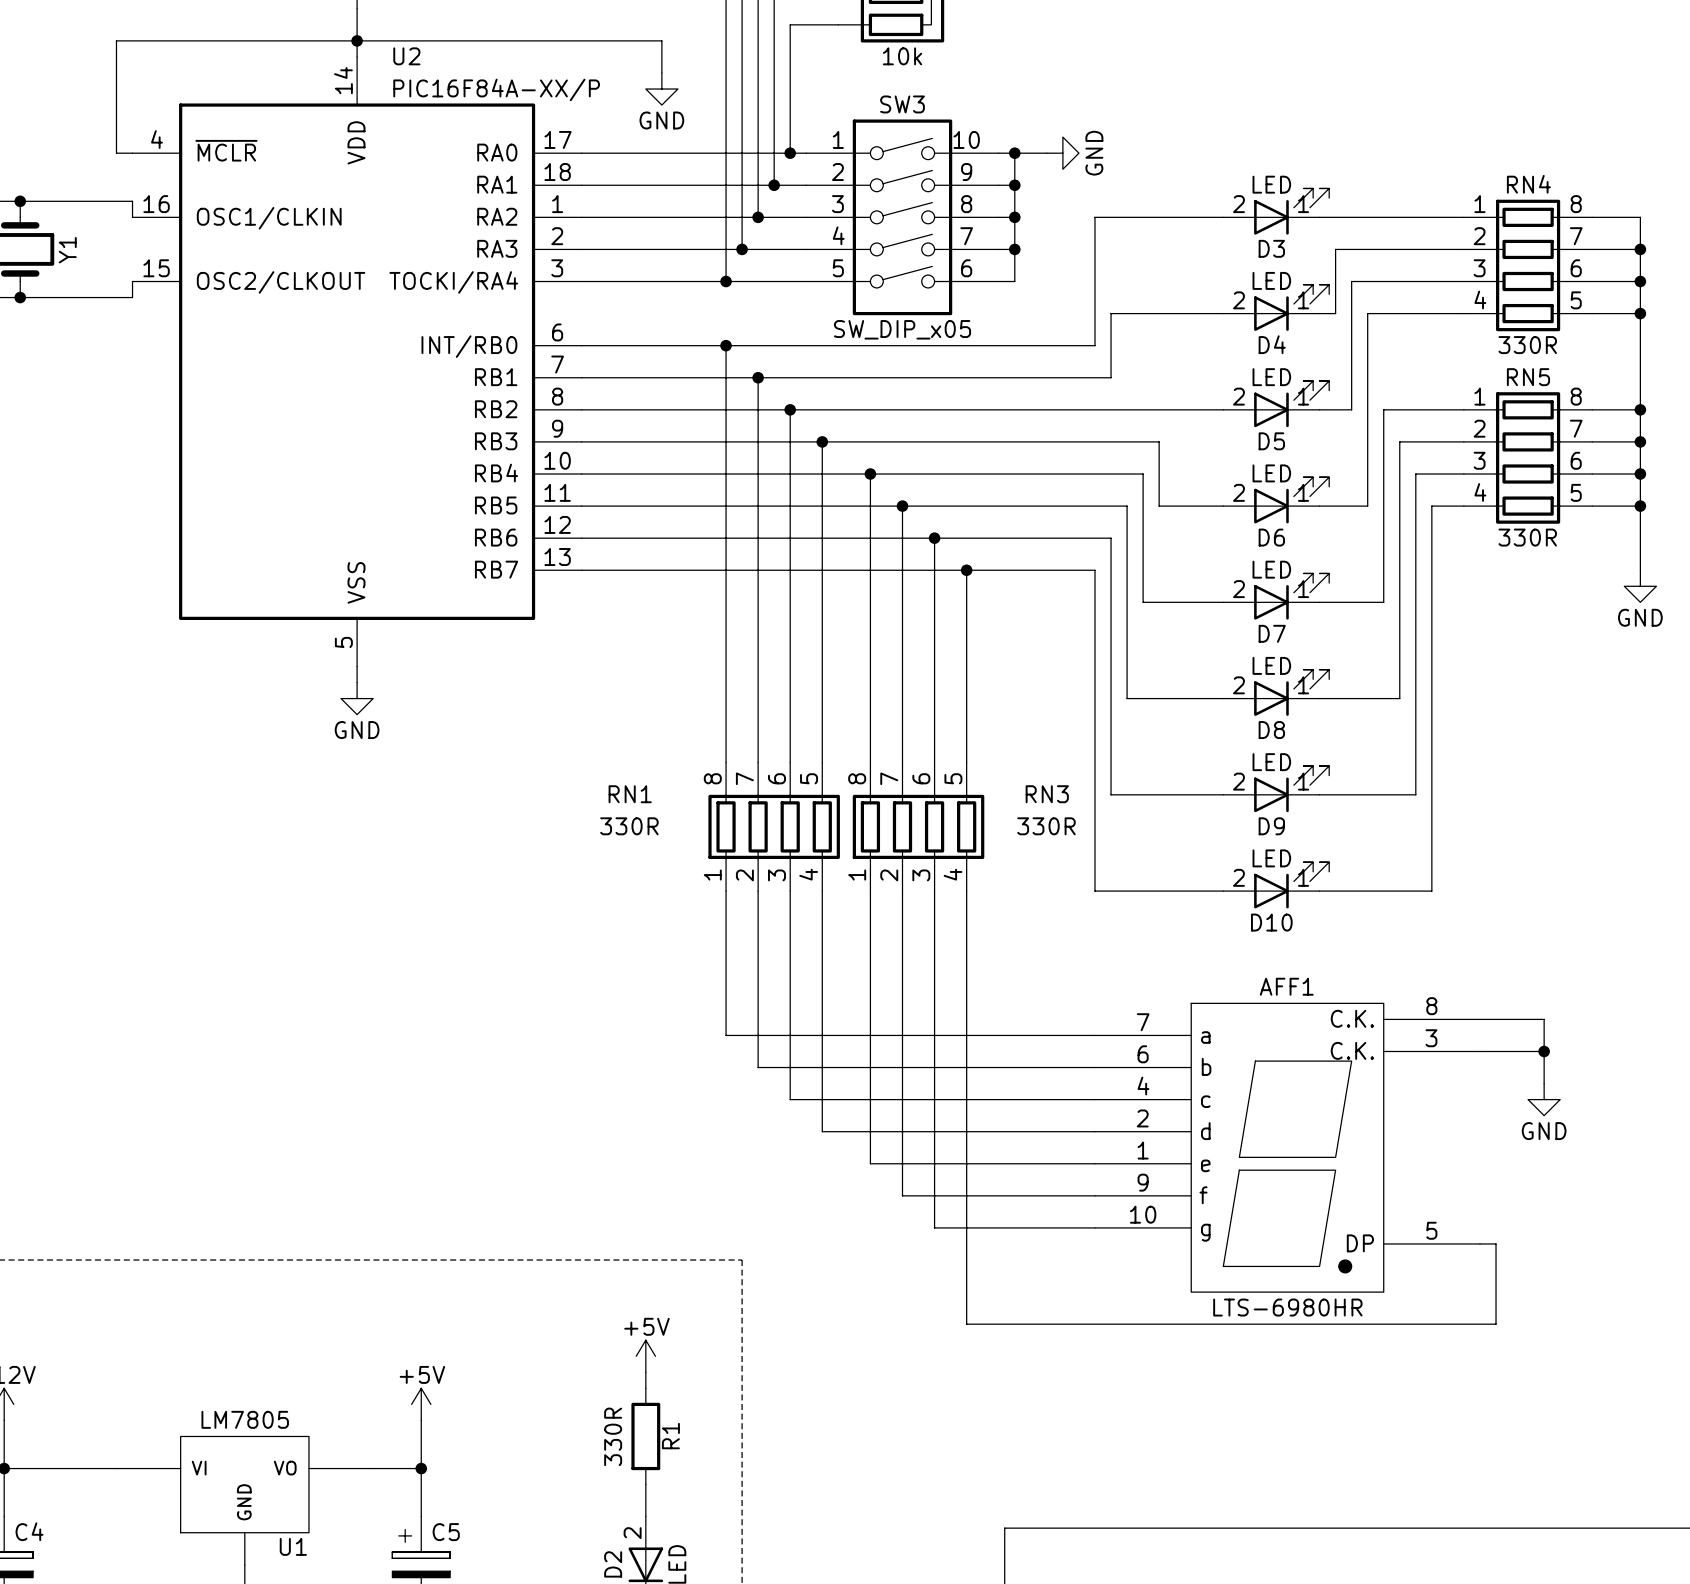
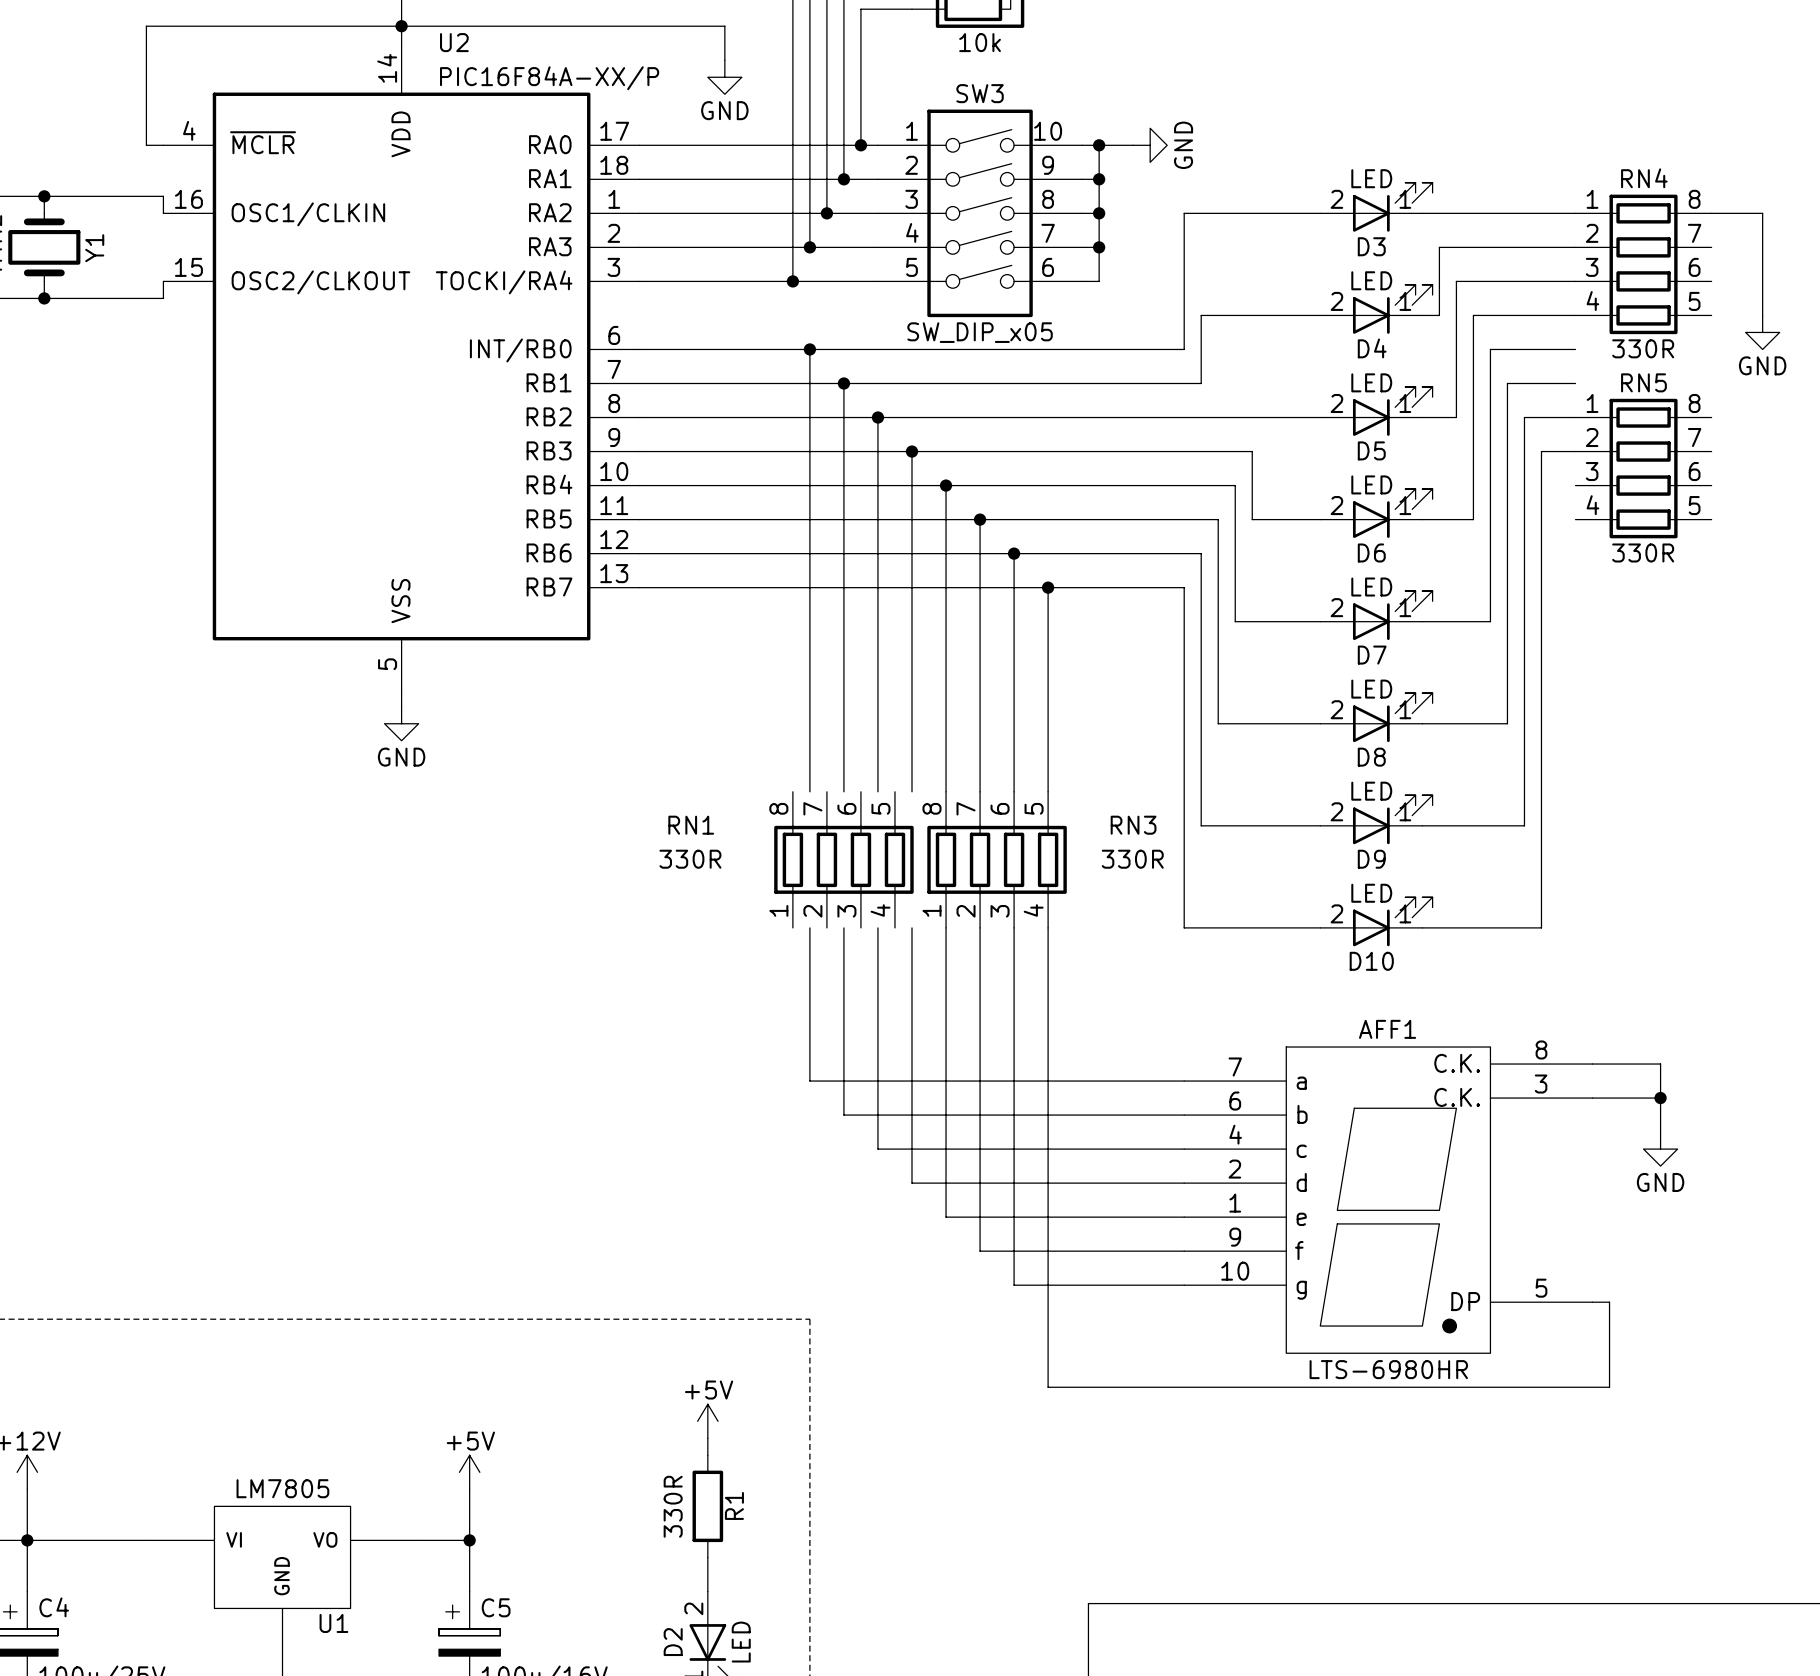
wire: (1592, 249) (1640, 249) -> none
junction: (1640, 249) -> none
wire: (1592, 281) (1640, 281) -> none
junction: (1640, 281) -> none
wire: (1592, 313) (1640, 313) (1640, 570) -> none
junction: (1640, 313) -> none
wire: (726, 345) (726, 762) -> (809, 349) (809, 791)
junction position: (726, 345) -> (809, 349)
wire: none -> (1575, 349) (1490, 349) (1490, 417)
wire: (758, 377) (758, 762) -> (843, 383) (843, 791)
junction position: (758, 377) -> (843, 383)
wire: none -> (1575, 383) (1507, 383) (1507, 451)
wire: (790, 409) (790, 762) -> (877, 417) (877, 791)
junction position: (790, 409) -> (877, 417)
wire: (1383, 409) (1415, 409) -> (1524, 485) (1524, 417)
wire: (1592, 409) (1640, 409) -> none
junction: (1640, 409) -> none
wire: (822, 441) (822, 762) -> (911, 451) (911, 791)
junction position: (822, 441) -> (911, 451)
wire: (1399, 441) (1431, 441) -> (1541, 519) (1541, 451)
wire: (1592, 441) (1640, 441) -> none
junction: (1640, 441) -> none
wire: (1415, 474) (1463, 474) -> none
wire: (1592, 474) (1640, 474) -> none
junction: (1640, 474) -> none
wire: (1431, 506) (1463, 506) -> none
wire: (1592, 506) (1640, 506) -> none
junction: (1640, 506) -> none
power symbol position: GND (1640, 586) -> GND (1762, 332)
wire: (726, 891) (726, 1035) (742, 1035) -> (809, 927) (809, 1081)
wire: (758, 891) (758, 1067) (774, 1067) -> (843, 927) (843, 1115)
wire: (790, 891) (790, 1099) (806, 1099) -> (877, 927) (877, 1149)
wire: (822, 891) (822, 1131) (838, 1131) -> (911, 927) (911, 1183)

